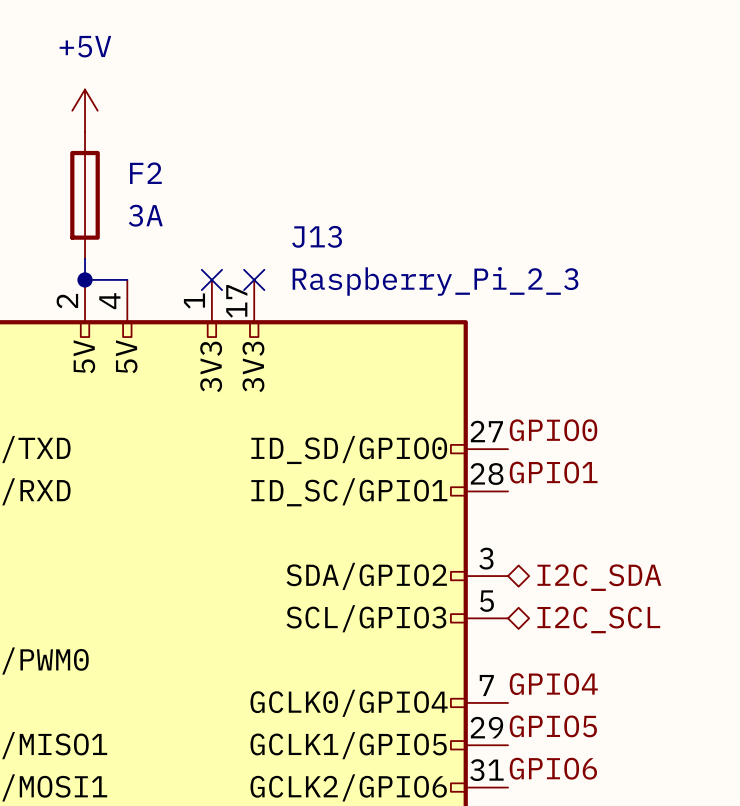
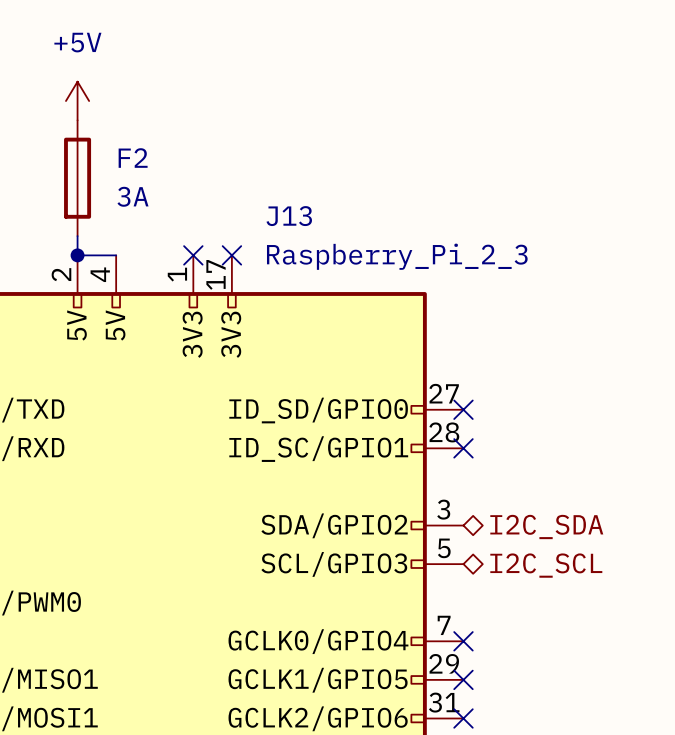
label: GPIO0 (553, 430) -> none
no-connect mark: none -> (463, 409)
label: GPIO1 (553, 472) -> none
no-connect mark: none -> (463, 448)
label: GPIO4 (553, 684) -> none
no-connect mark: none -> (463, 641)
label: GPIO5 (553, 726) -> none
no-connect mark: none -> (463, 679)
label: GPIO6 (553, 768) -> none
no-connect mark: none -> (463, 718)

